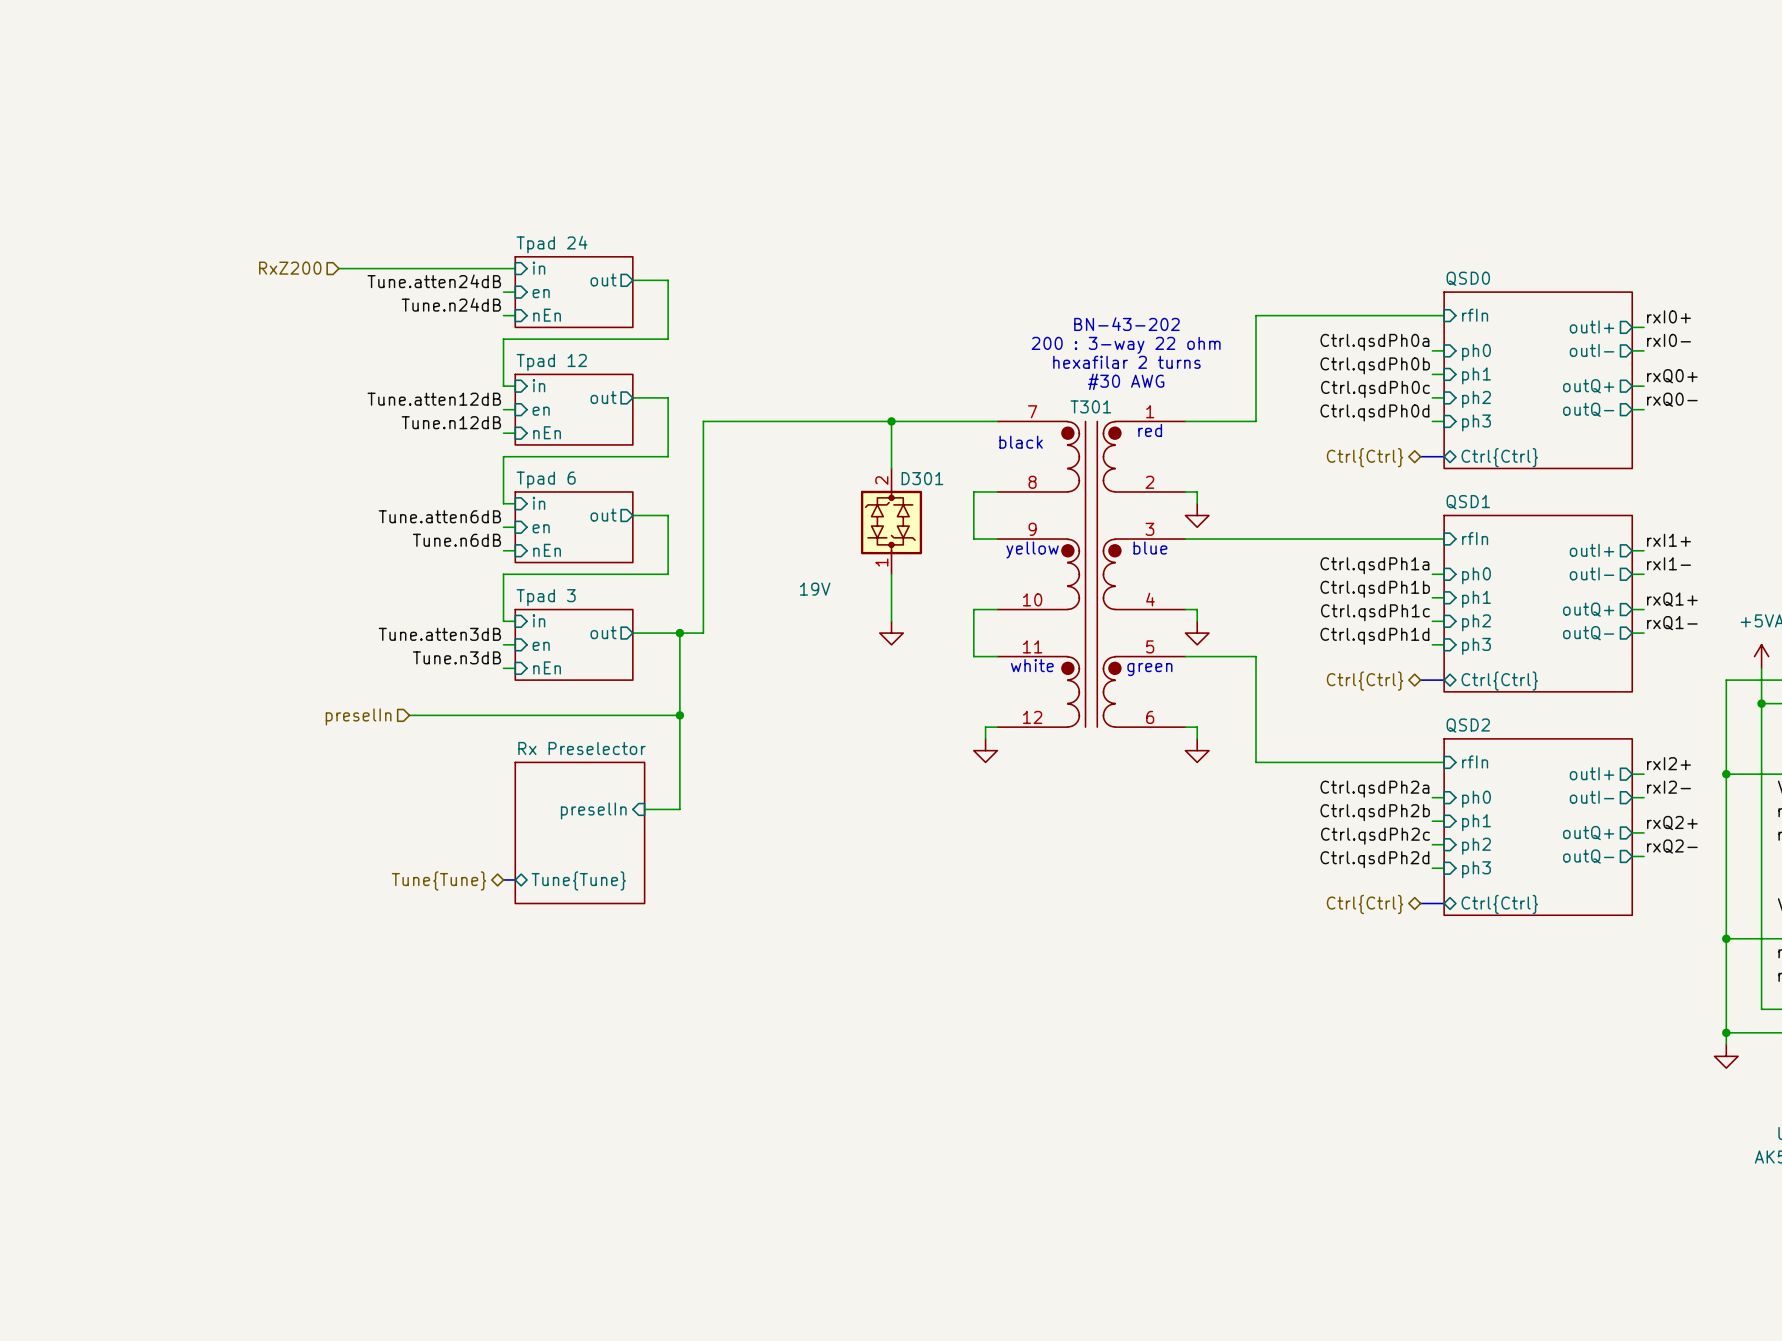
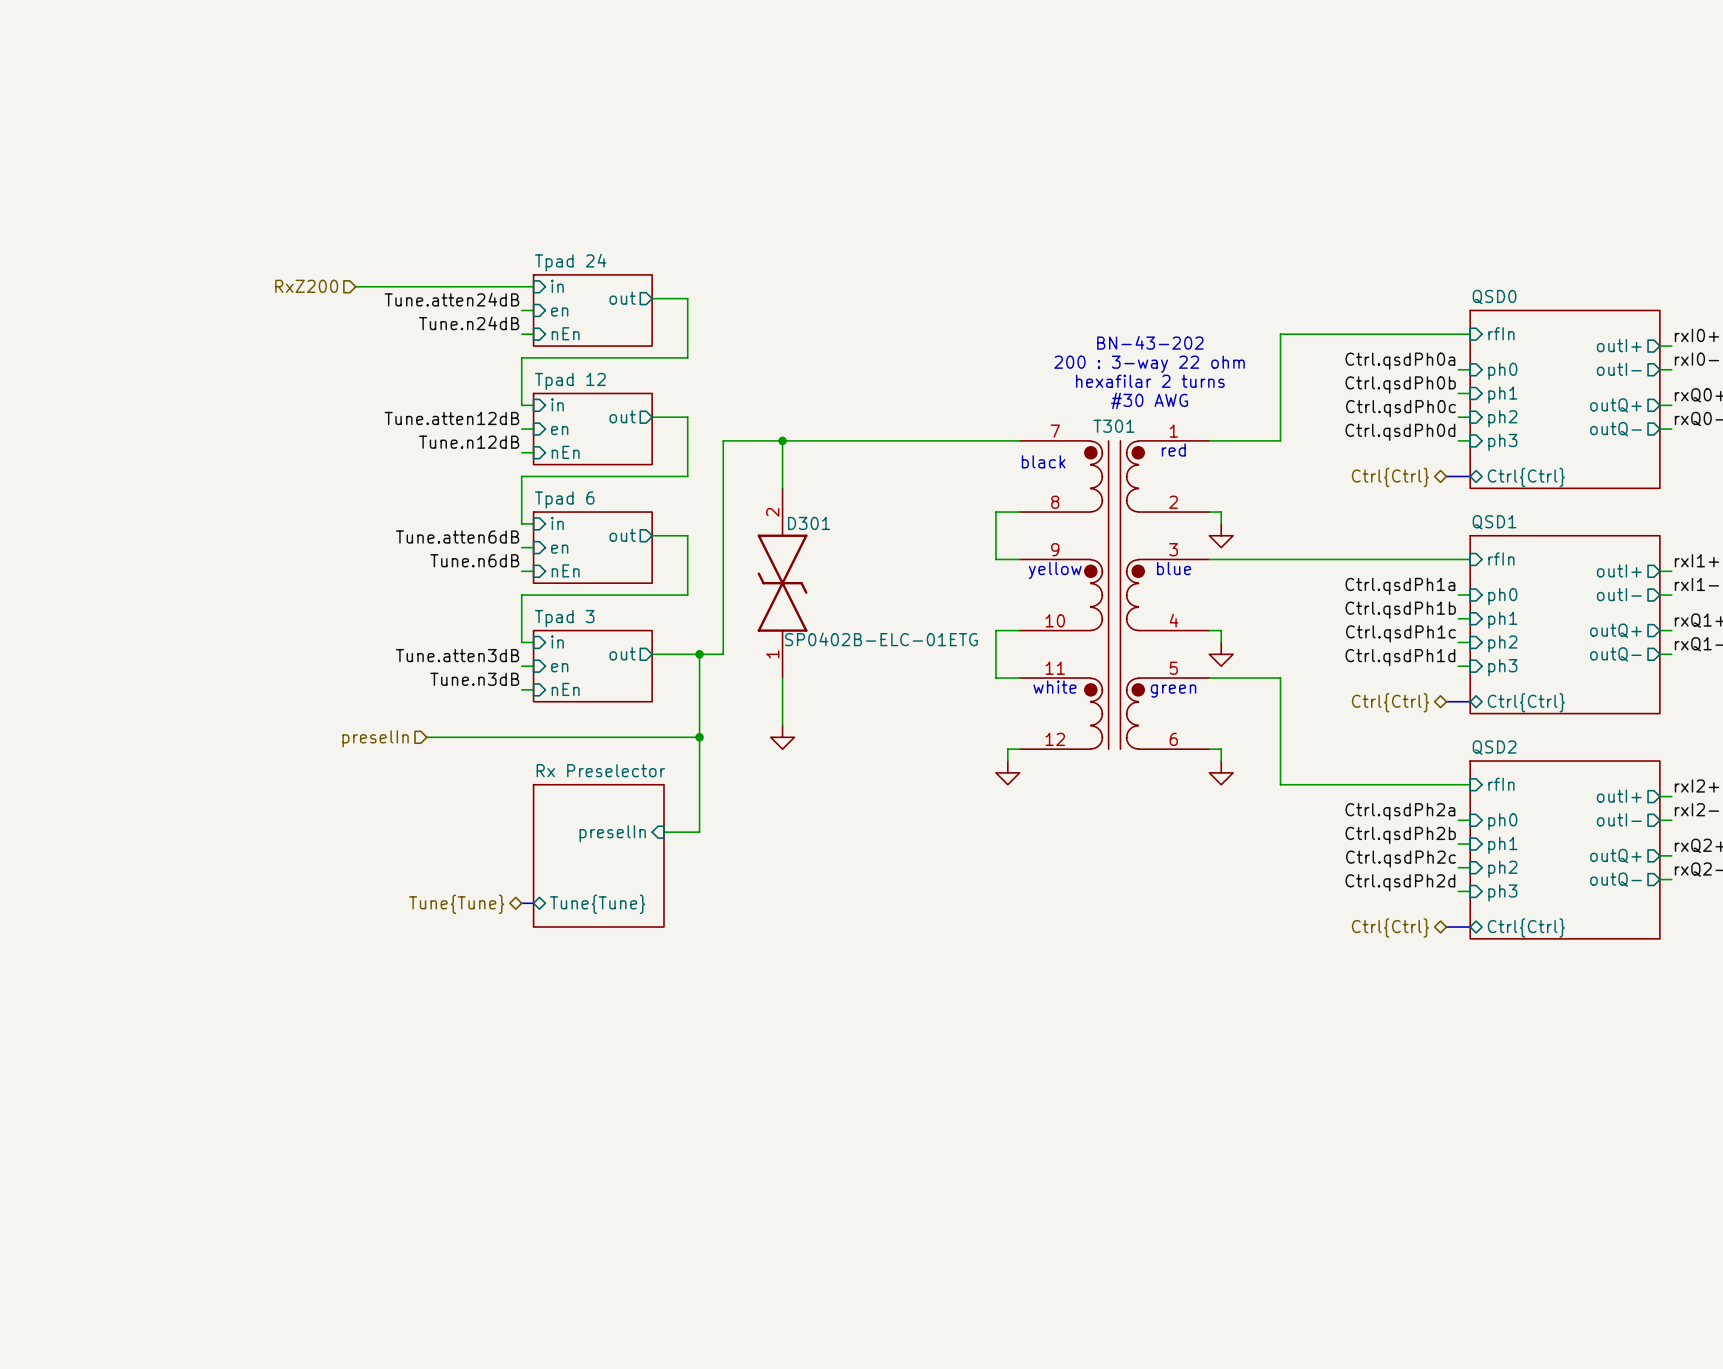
junction: none -> (782, 440)
wire: (891, 421) (891, 468) -> (782, 440) (782, 488)
junction: (891, 421) -> none
D301 symbol: [860, 468, 923, 575] -> [757, 488, 808, 679]
wire: (891, 574) (891, 621) -> (782, 678) (782, 725)
D301 value: 19V (815, 589) -> SP0402B-ELC-01ETG (881, 639)
power symbol position: (891, 633) -> (782, 737)

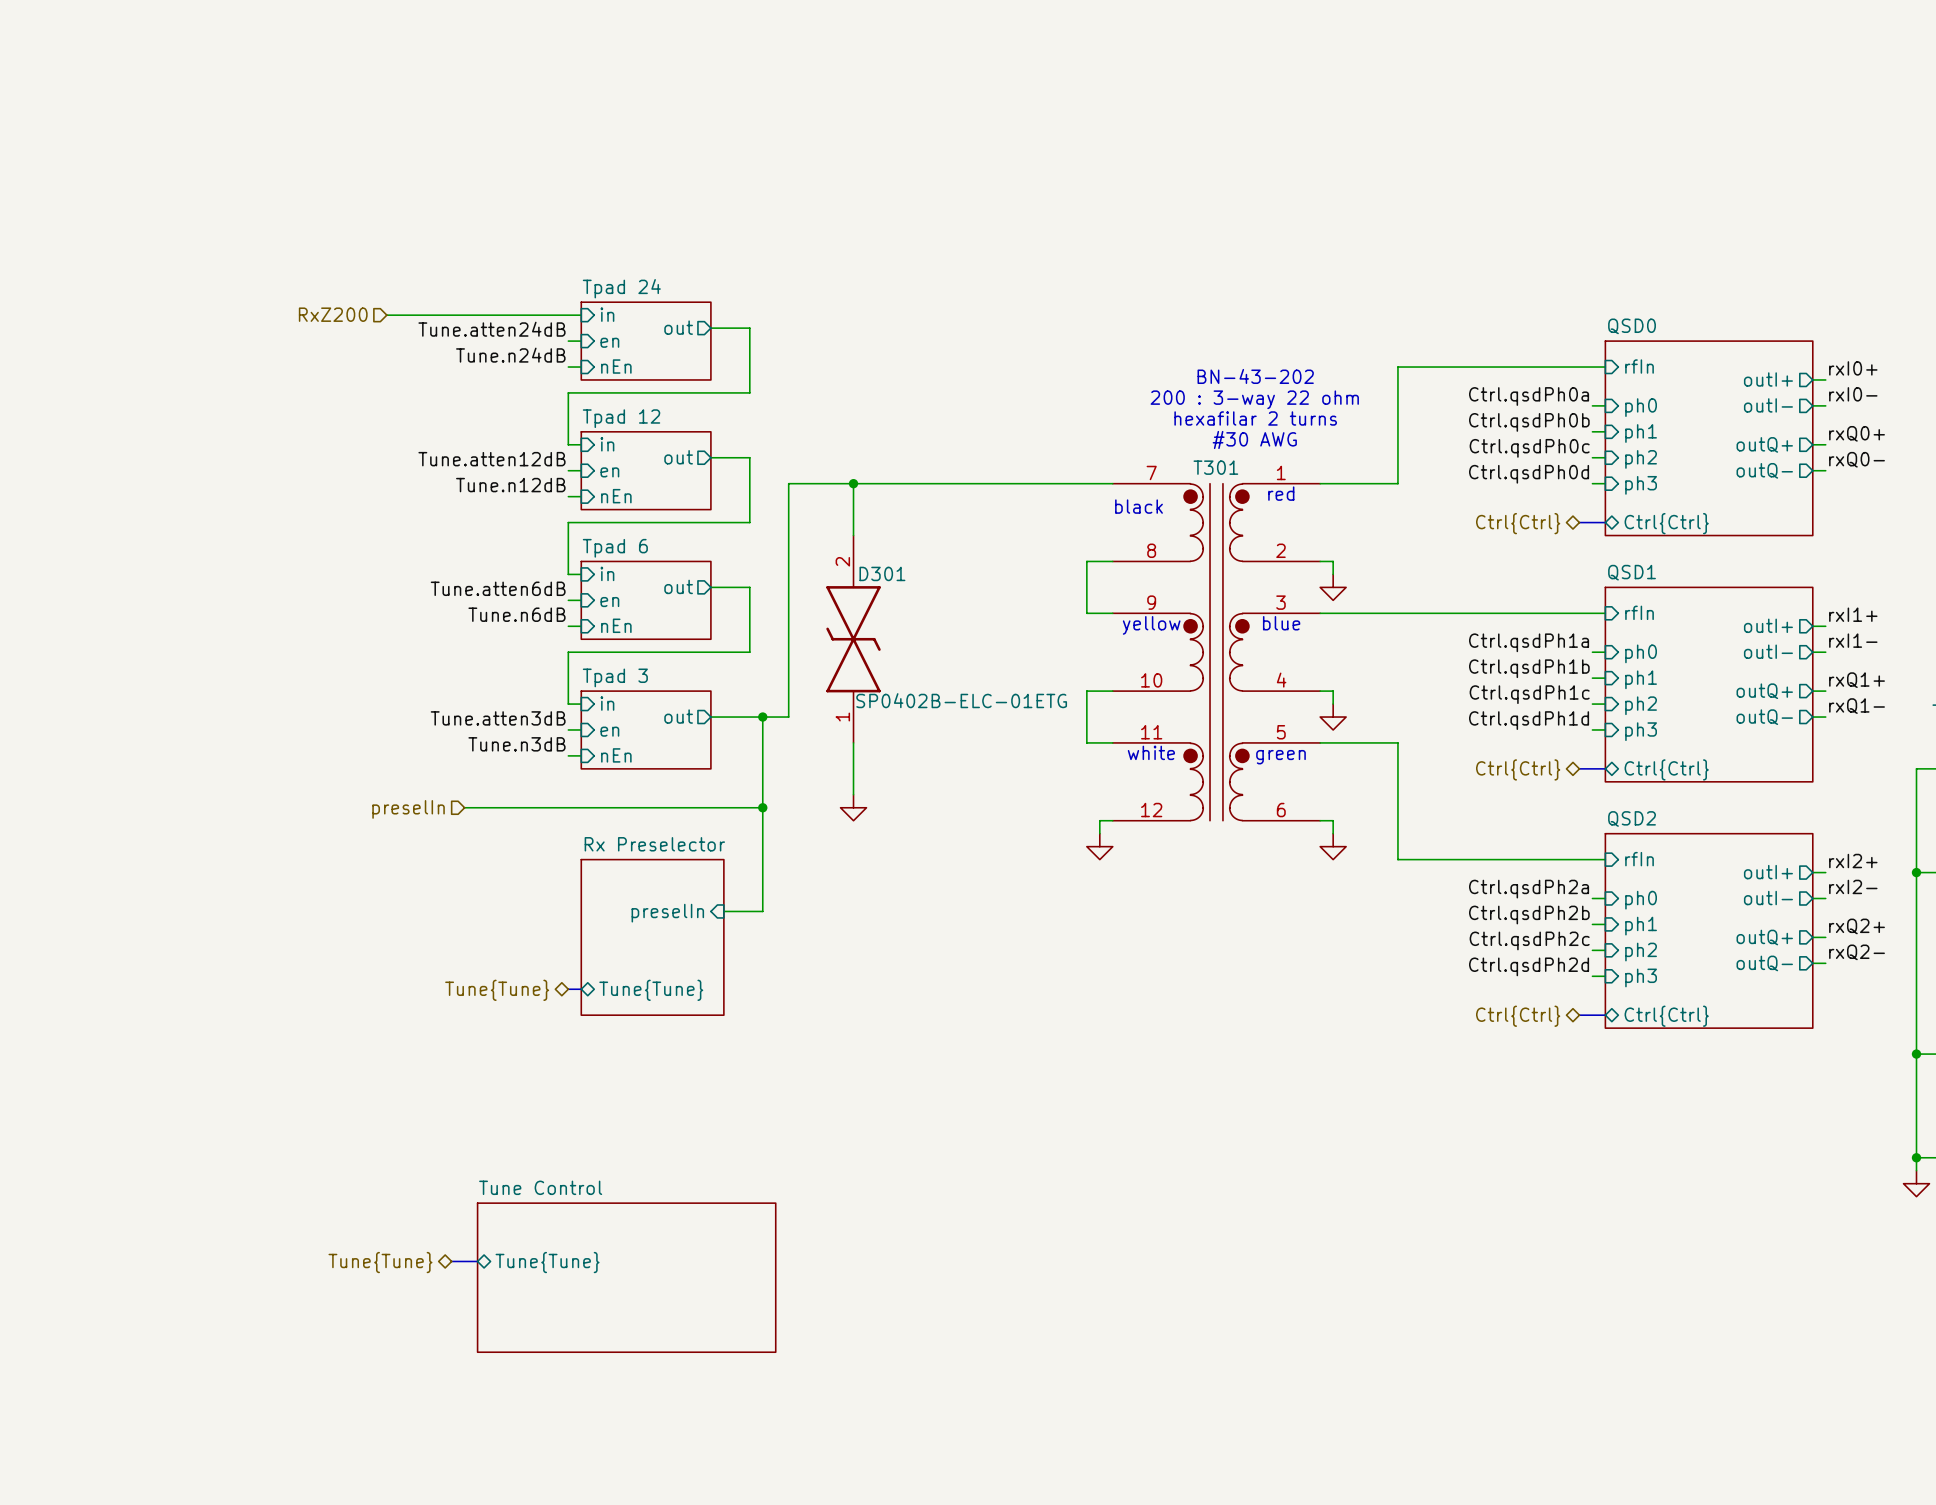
bus: none -> (451, 1261) (477, 1261)
hierarchical label: none -> Tune{Tune} (380, 1262)
sheet pin: none -> Tune{Tune} (547, 1262)
sheet Tune Control: none -> (626, 1277)

